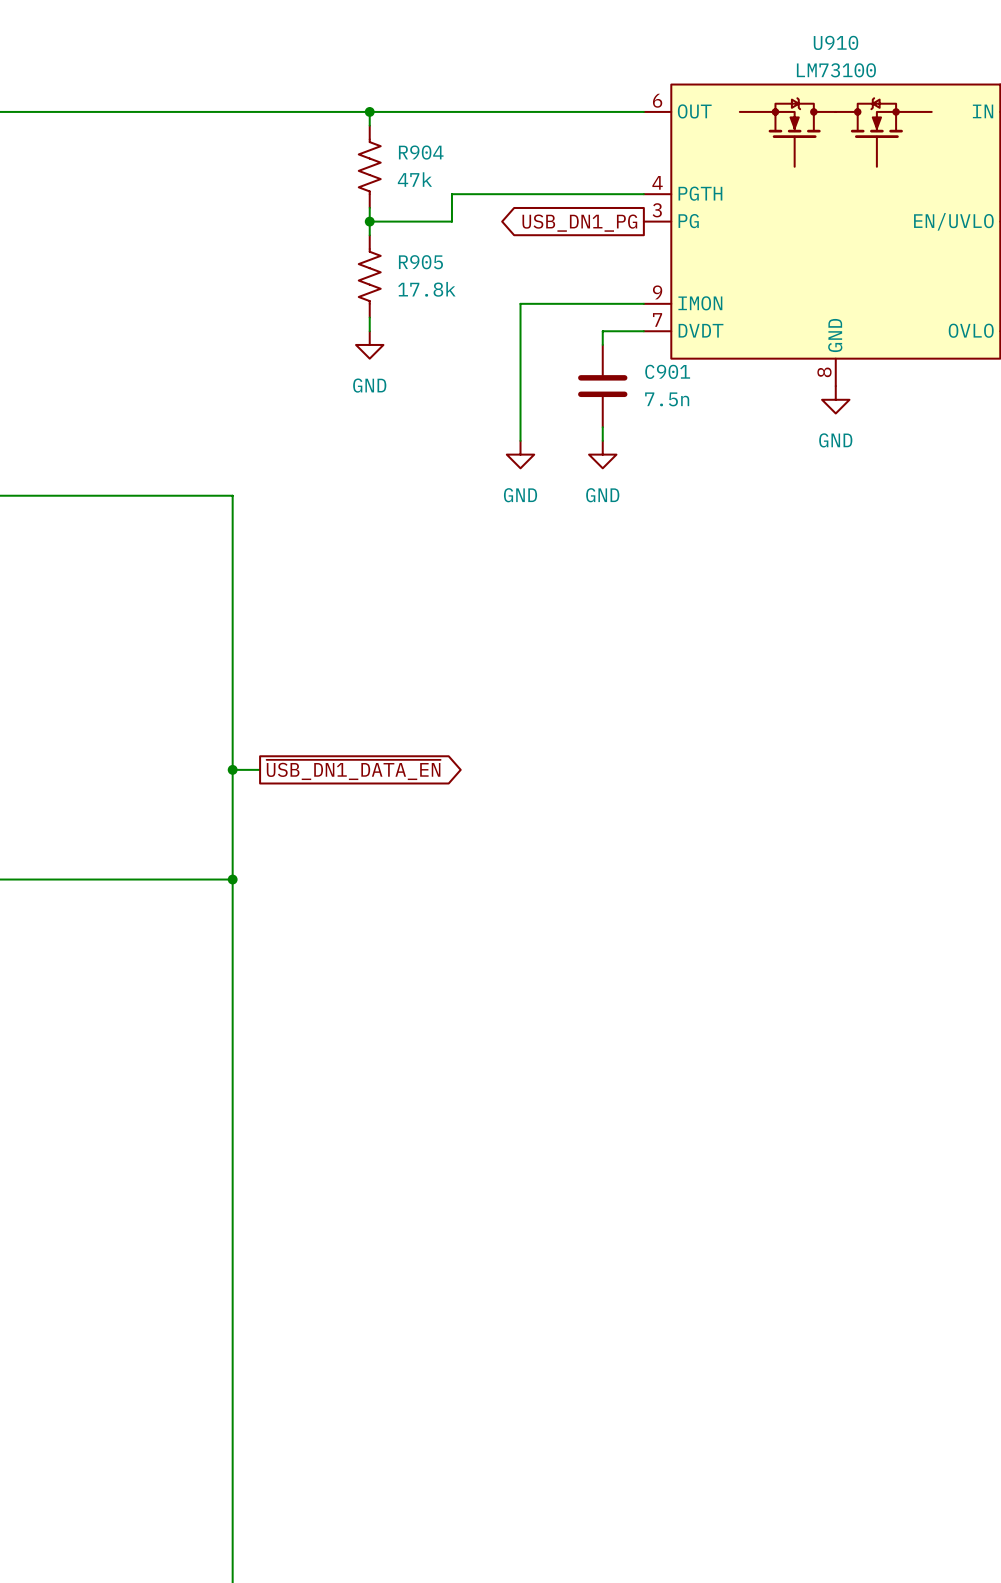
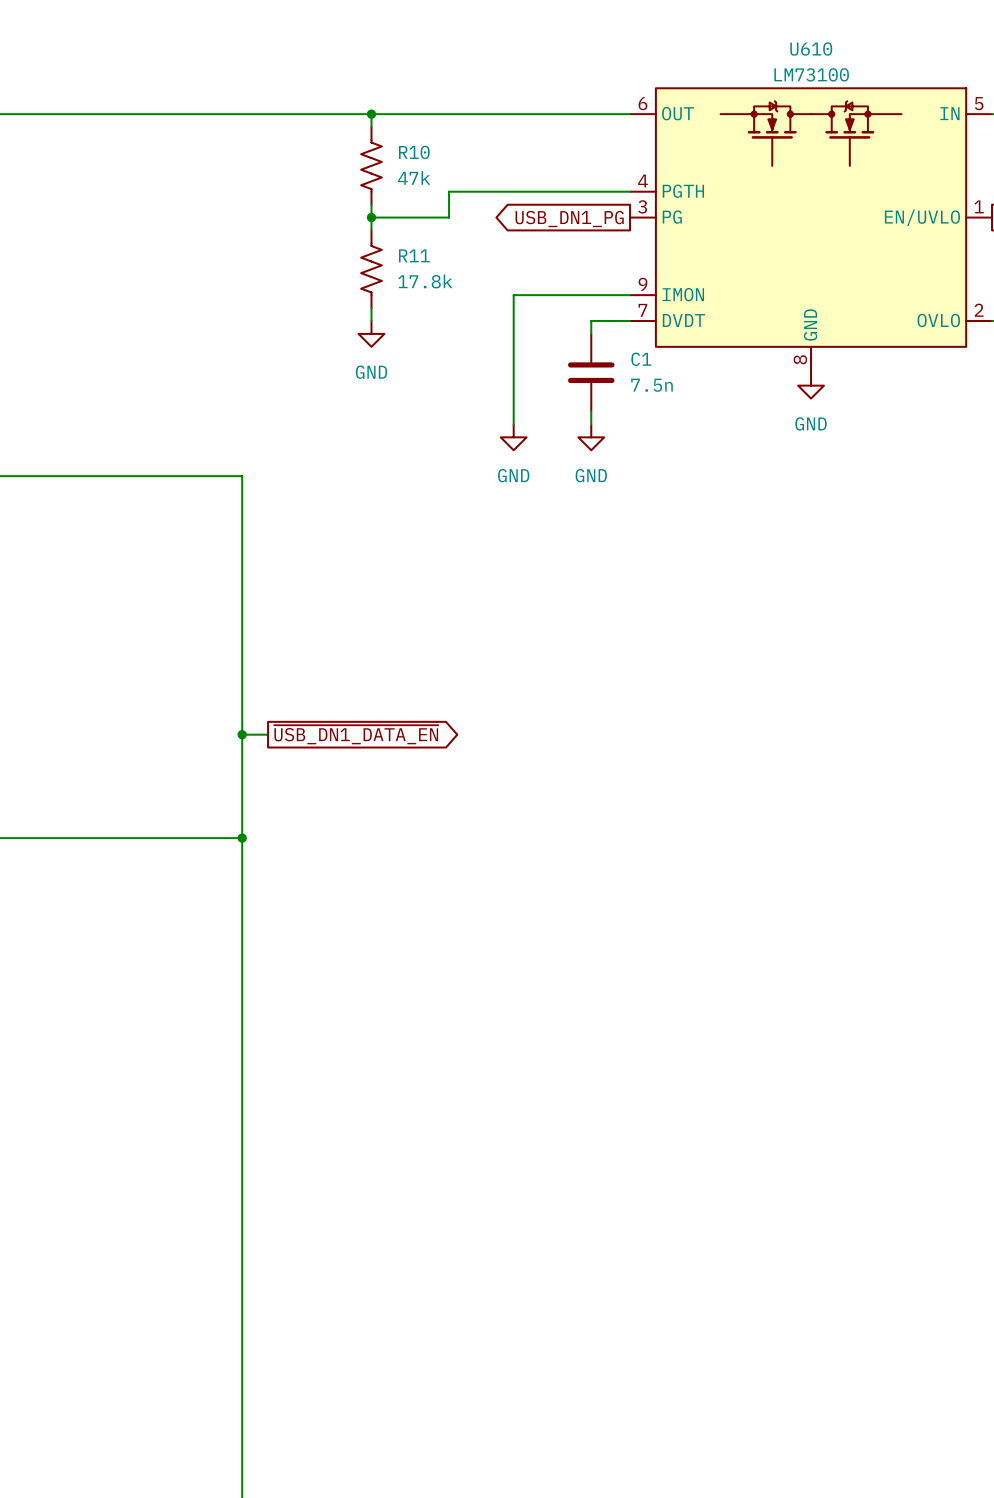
U910 name: U910 (836, 42) -> U610 (811, 49)
R904 name: R904 (421, 152) -> R10 (414, 152)
R905 name: R905 (420, 262) -> R11 (414, 255)
C901 name: C901 (667, 371) -> C1 (641, 359)

